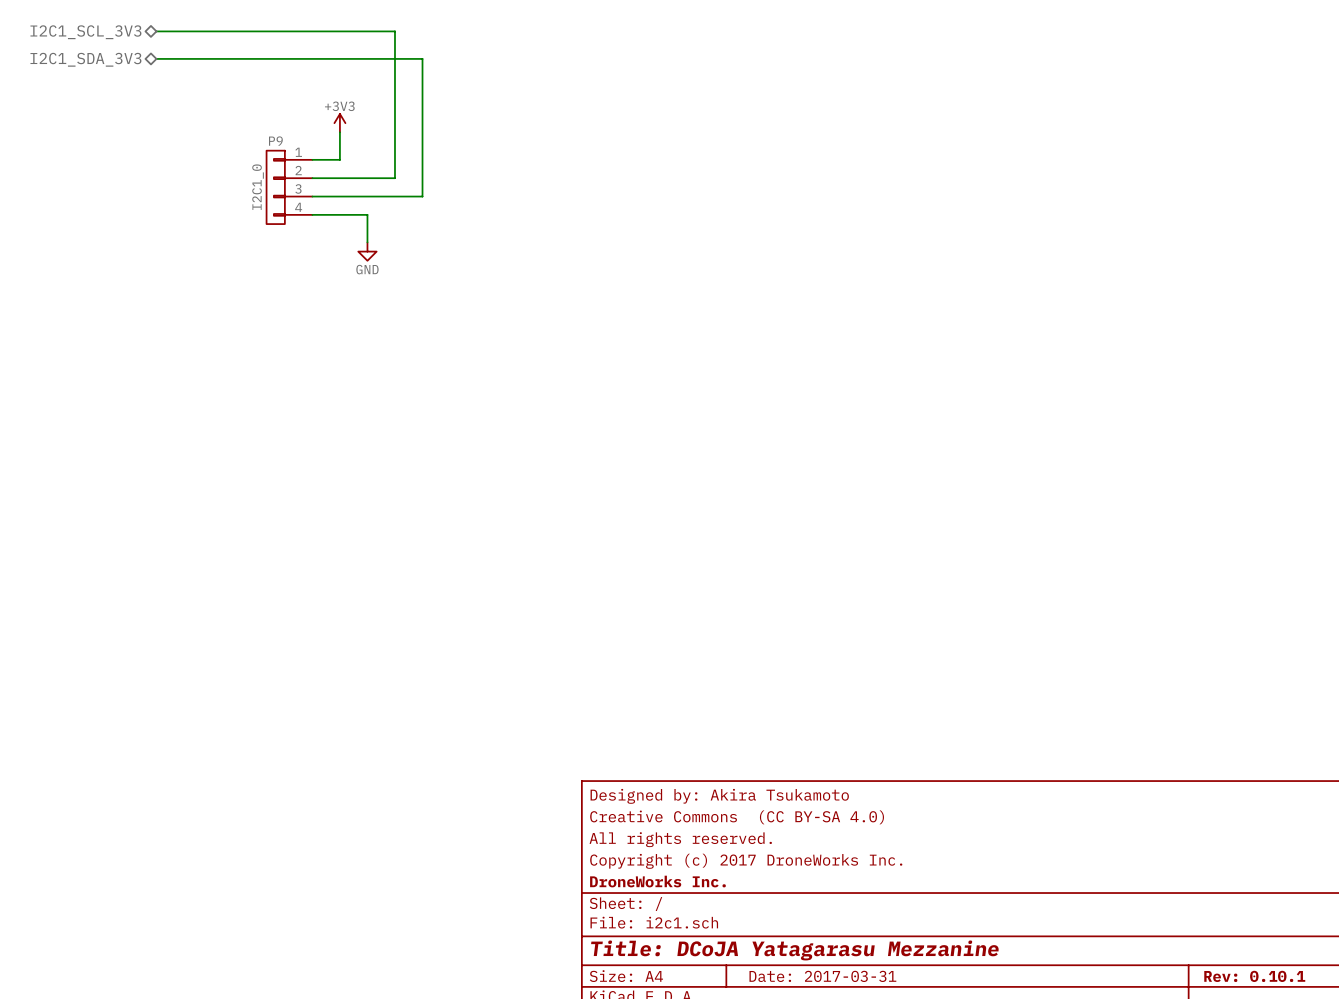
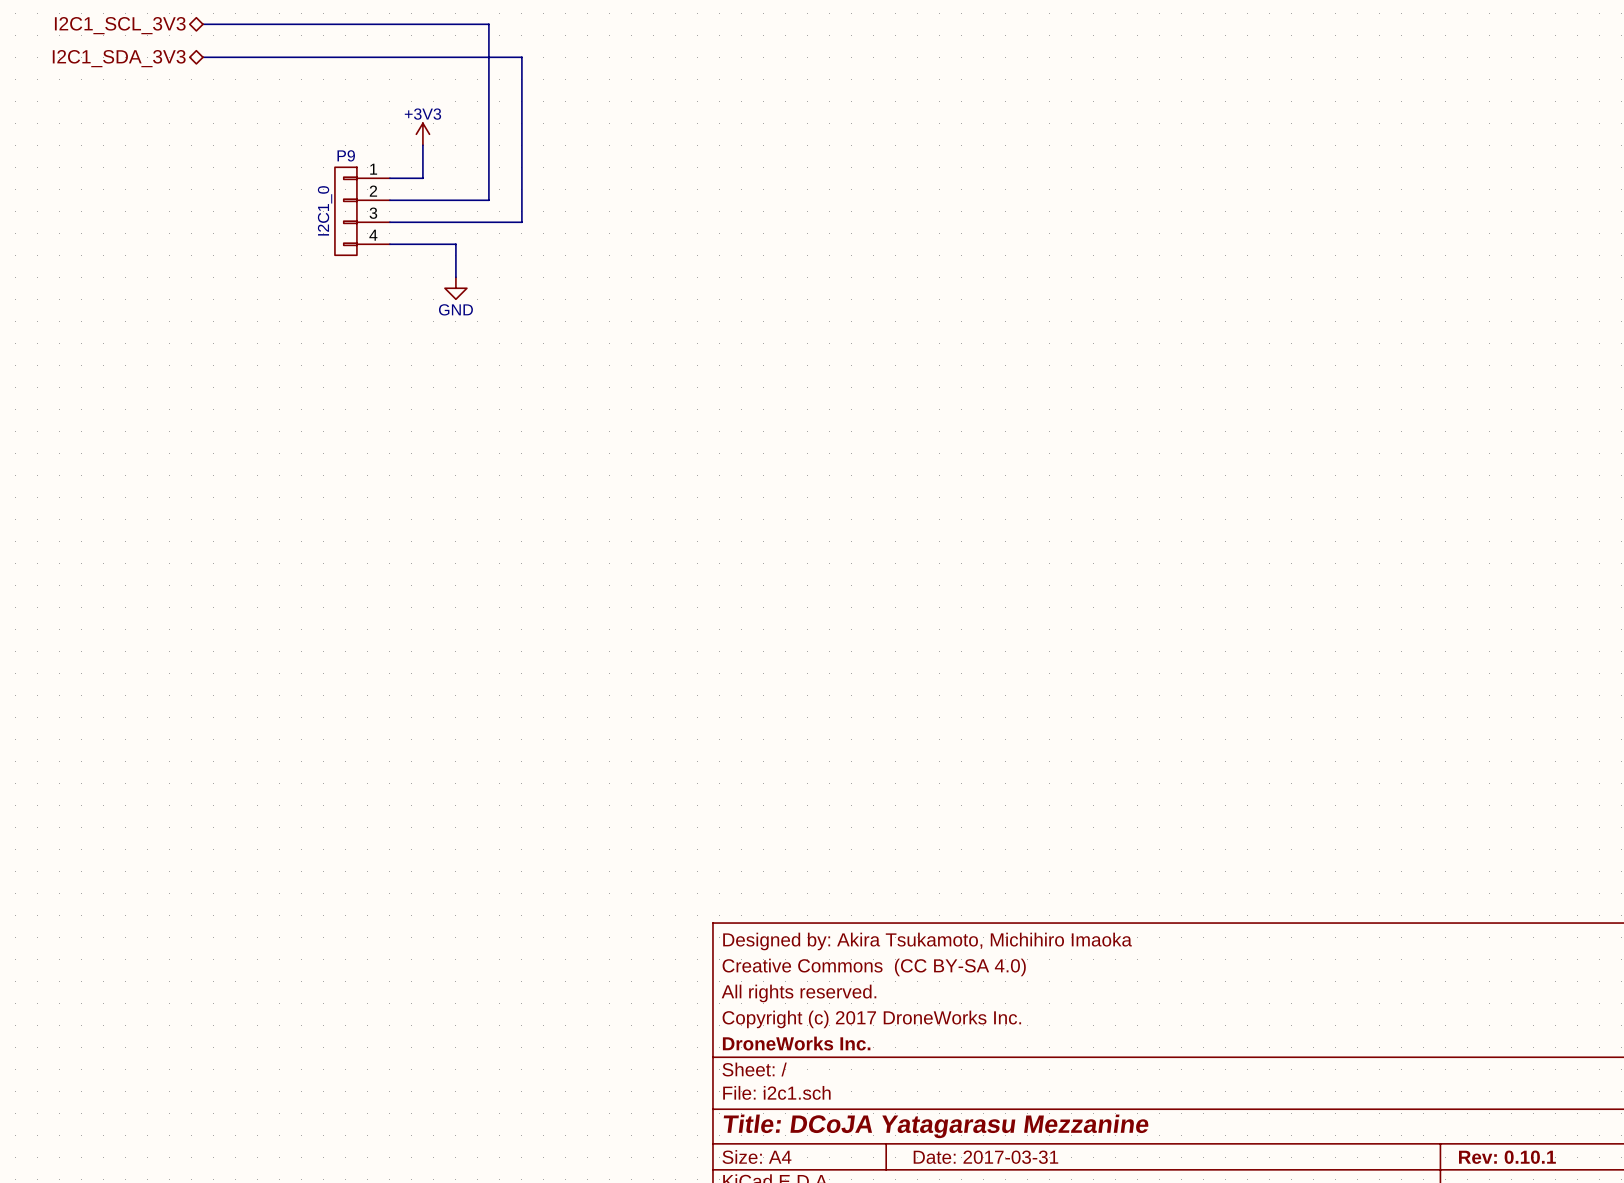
title block: Designed by: Akira Tsukamoto (719, 796) -> Designed by: Akira Tsukamoto, Michihiro Imaoka (927, 941)

